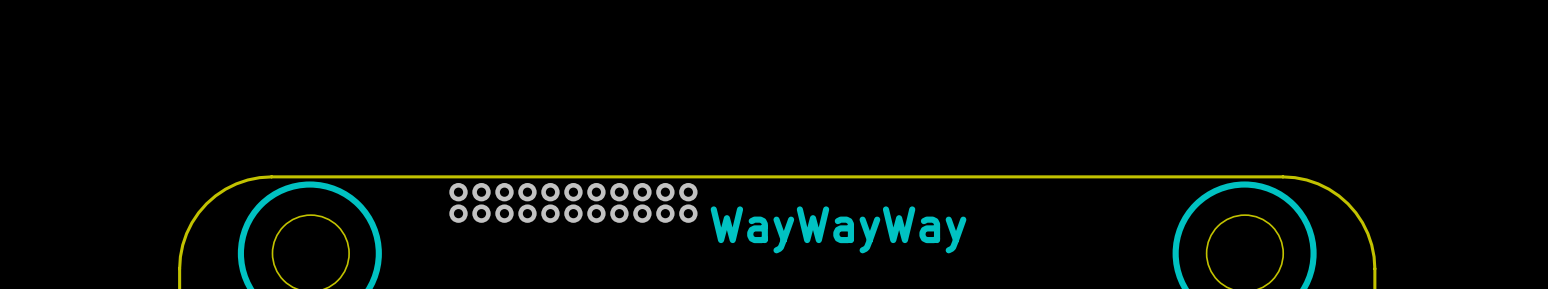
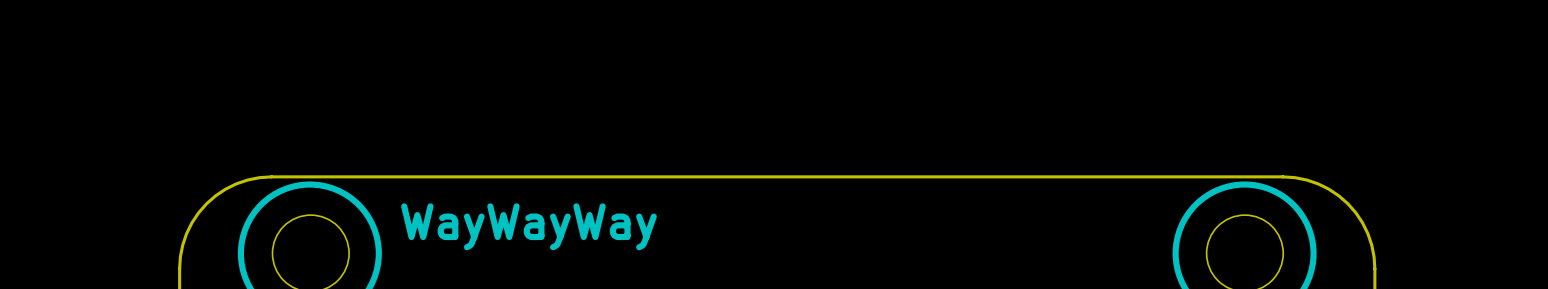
via: (458, 192) -> none
via: (481, 192) -> none
via: (504, 192) -> none
via: (527, 192) -> none
via: (550, 192) -> none
via: (573, 192) -> none
via: (596, 192) -> none
via: (619, 192) -> none
via: (642, 192) -> none
via: (665, 192) -> none
via: (688, 192) -> none
via: (458, 213) -> none
via: (481, 213) -> none
via: (504, 213) -> none
via: (527, 213) -> none
via: (550, 213) -> none
via: (573, 213) -> none
via: (596, 213) -> none
via: (619, 213) -> none
via: (642, 213) -> none
via: (665, 213) -> none
via: (688, 213) -> none
text position: WayWayWay (838, 229) -> WayWayWay (529, 226)

